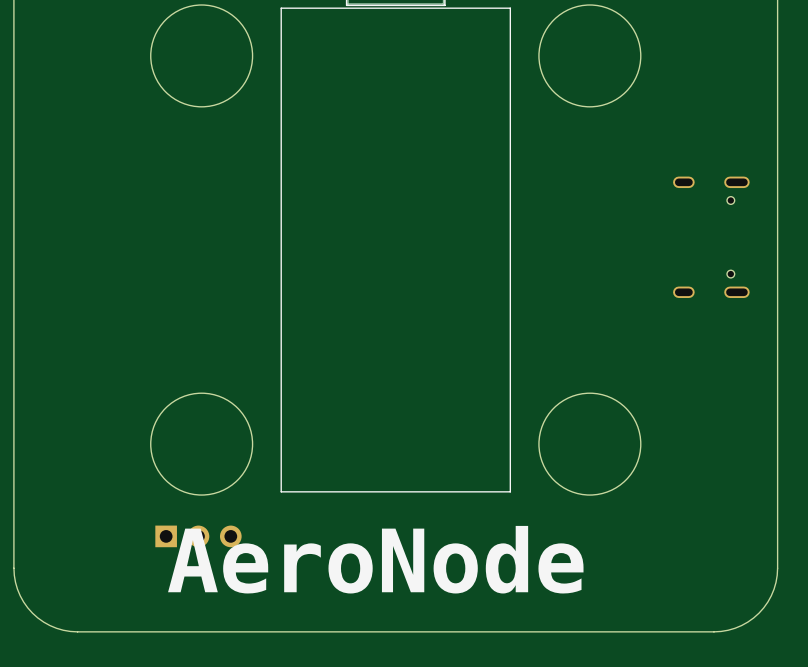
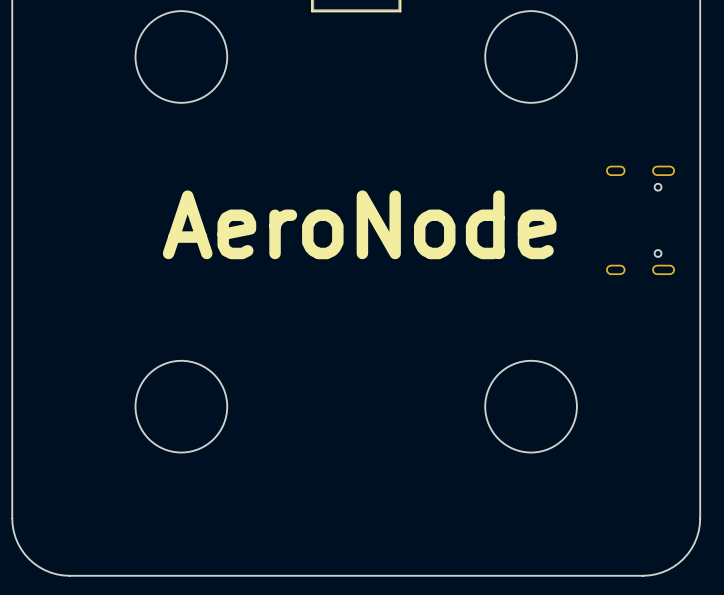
line: (510, 8) (281, 8) (281, 491) (510, 491) (510, 8) -> none
text: none -> AeroNode (359, 224)
part: (198, 536) -> none
text: AeroNode (375, 559) -> none

